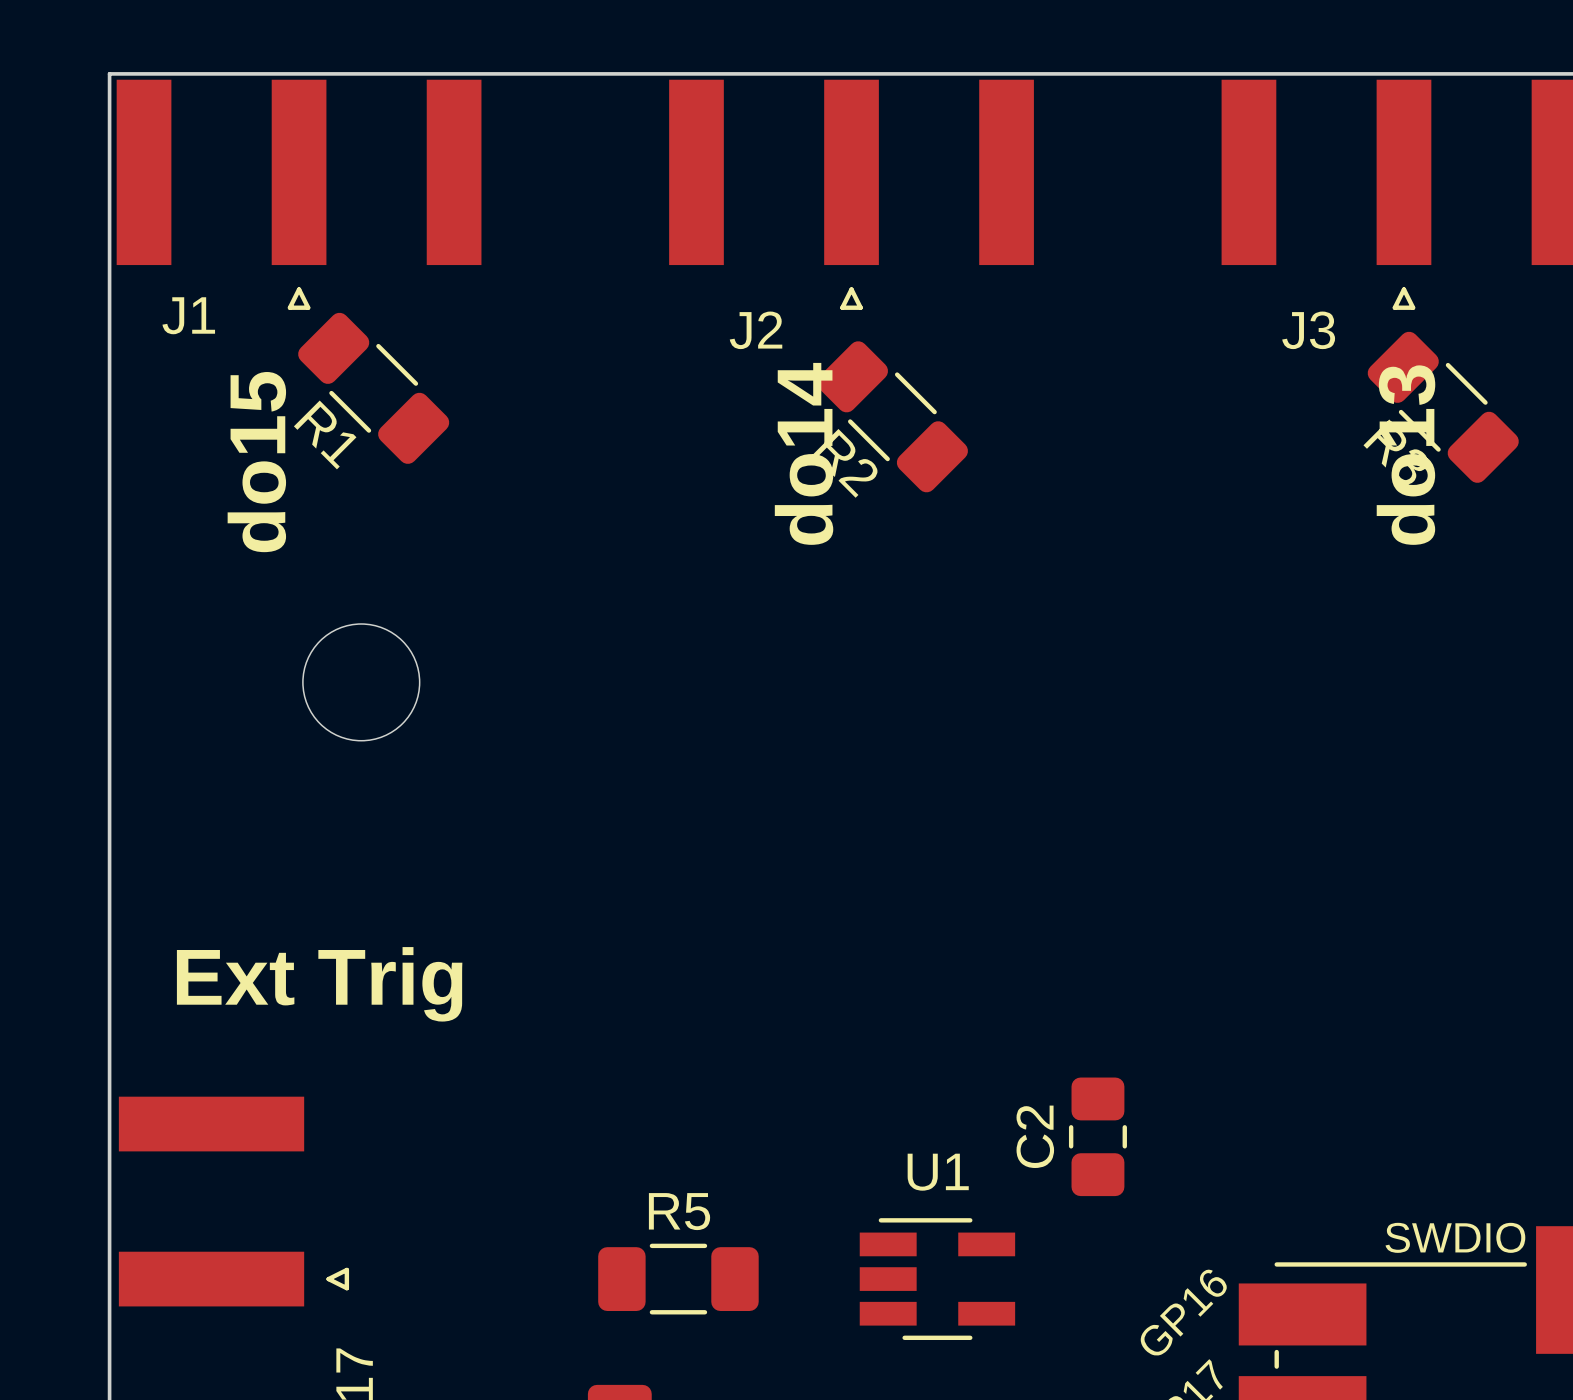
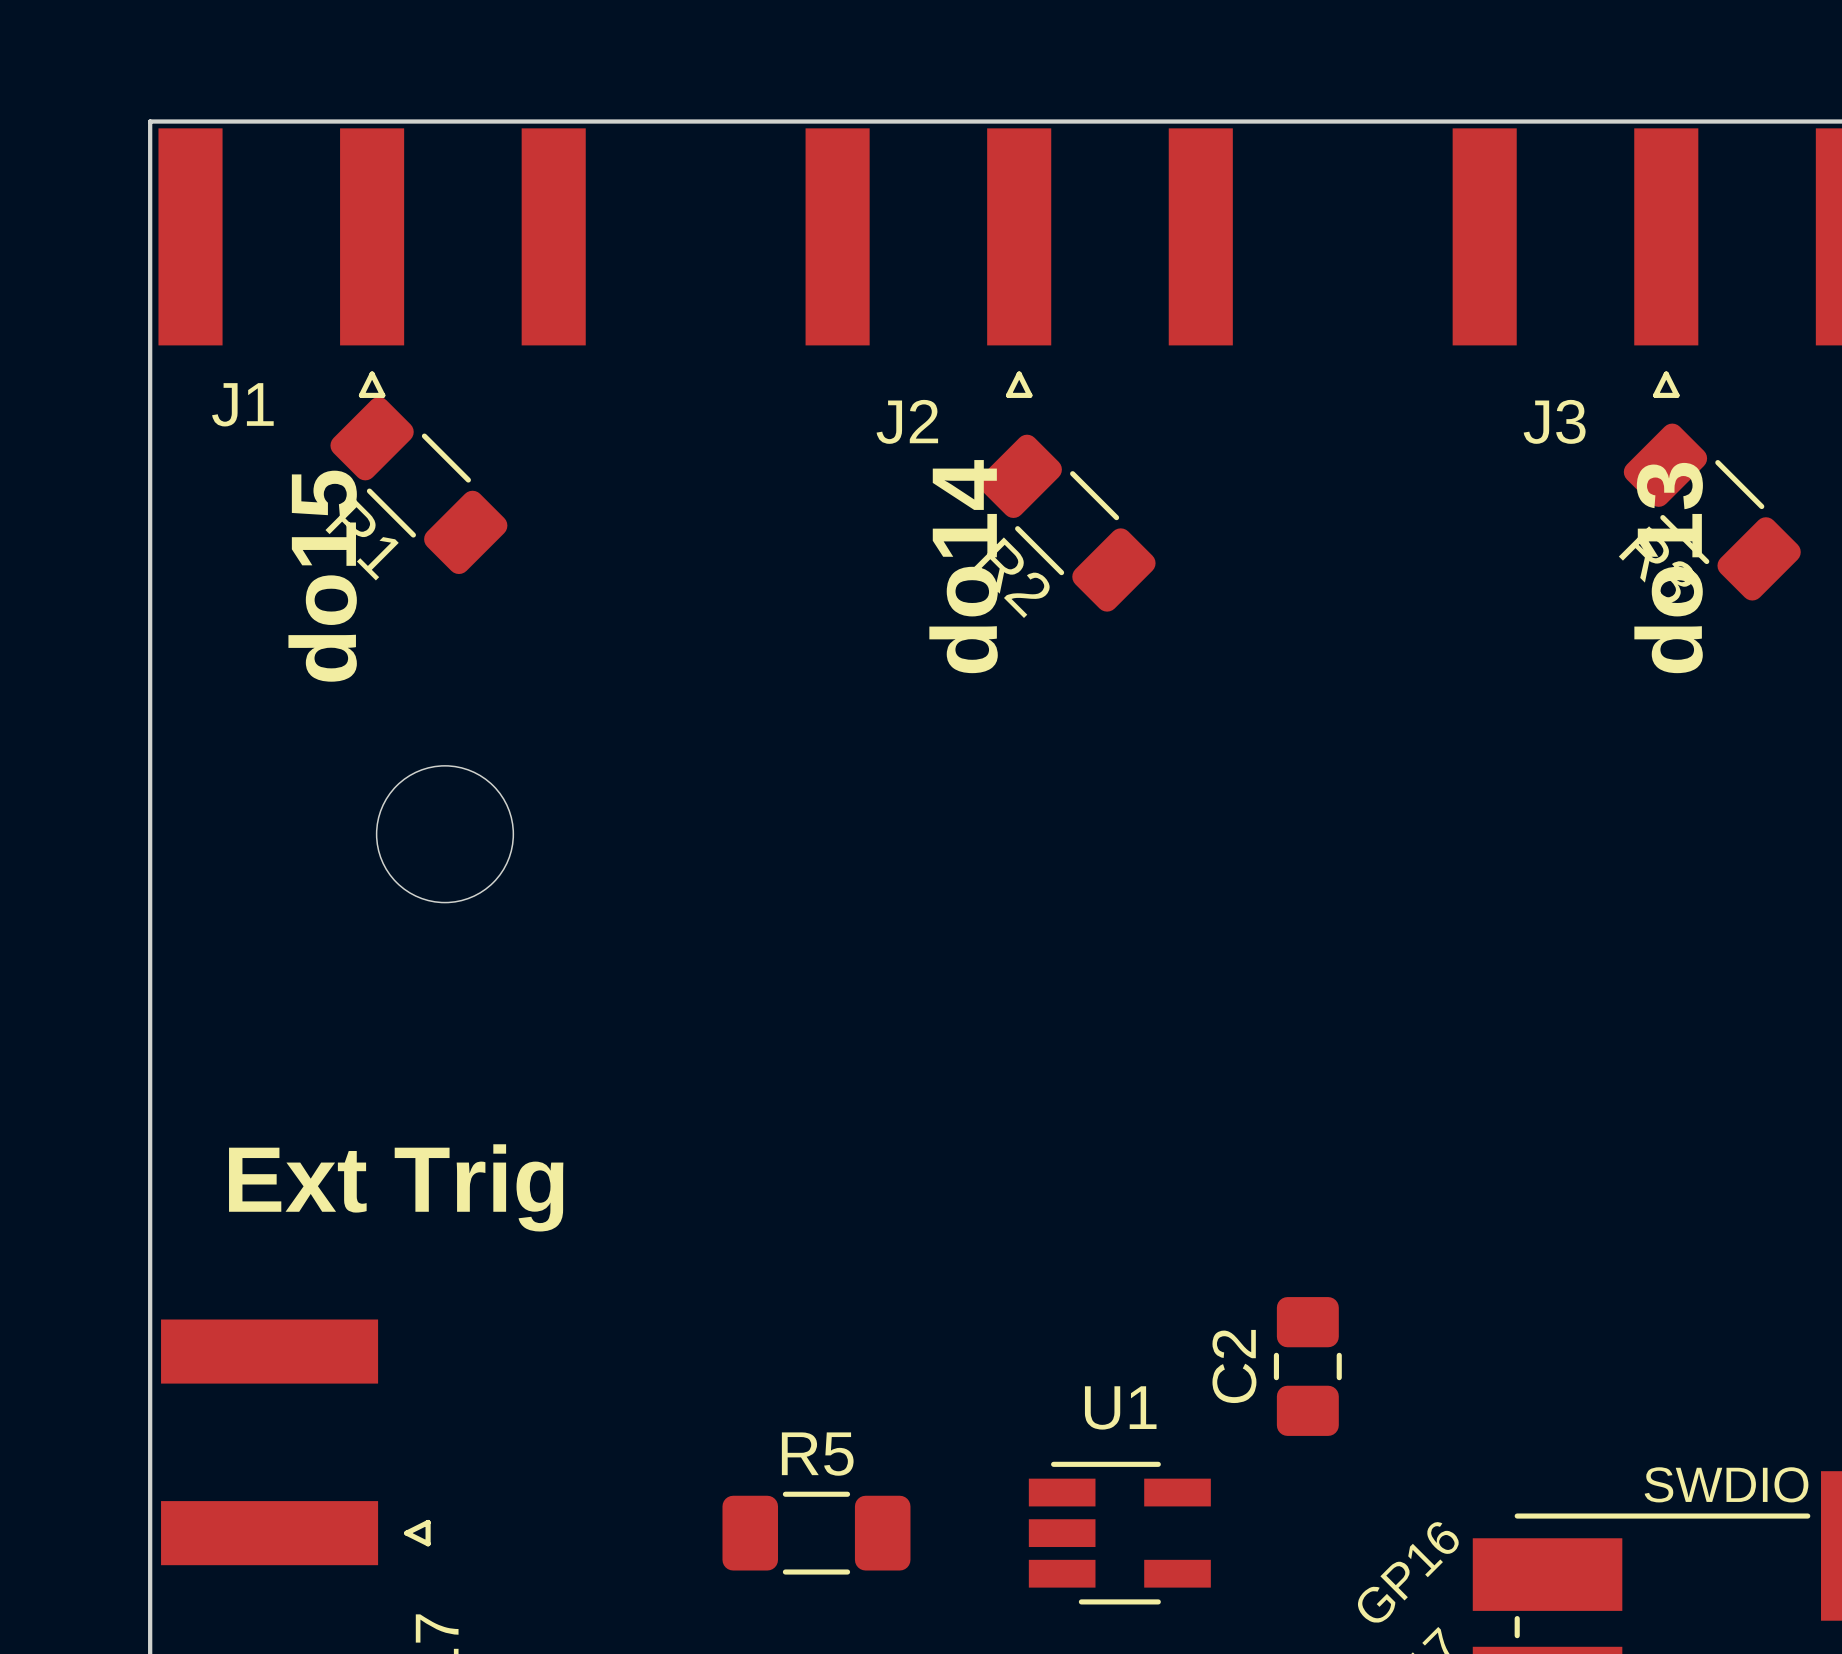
R1 position: (373, 388) -> (418, 485)

